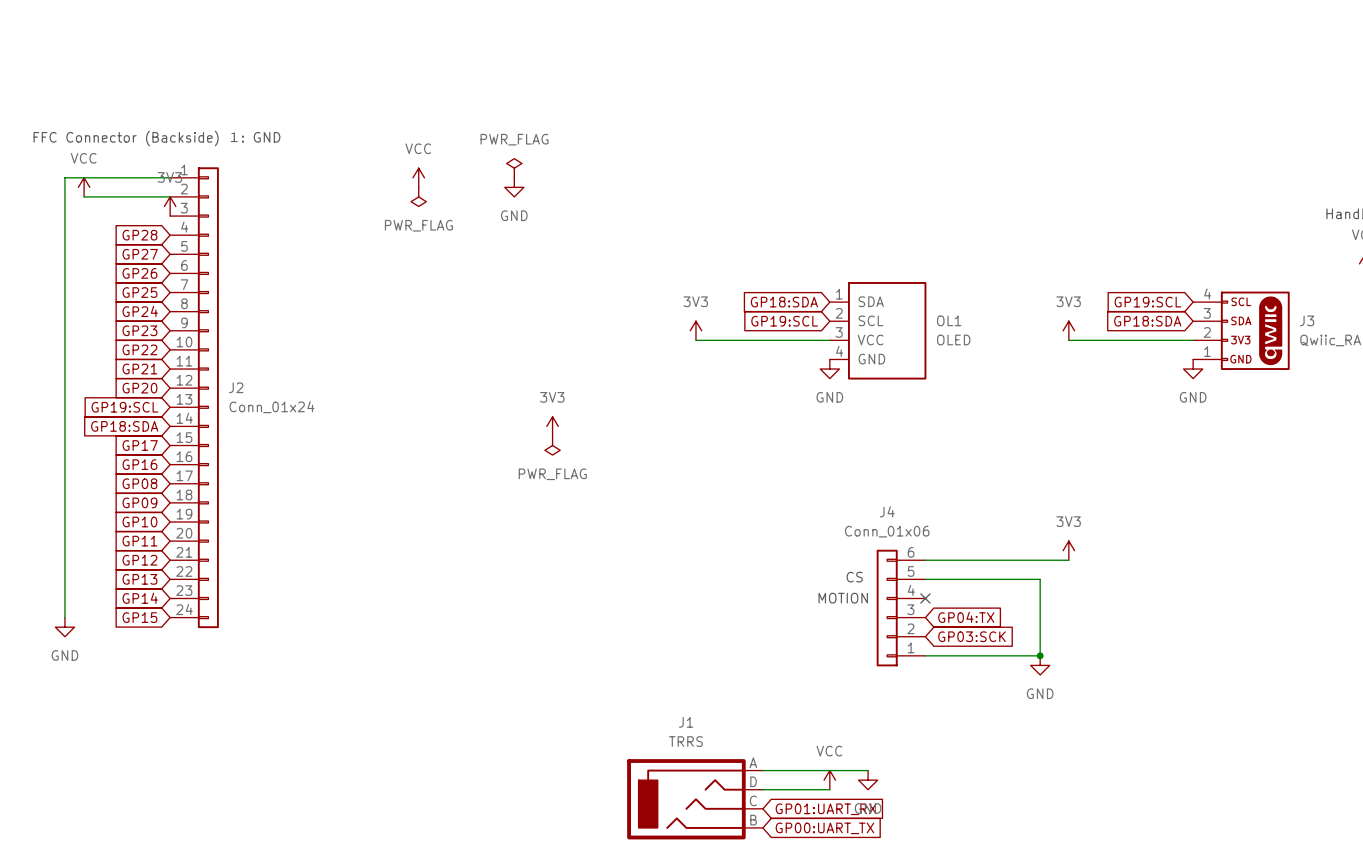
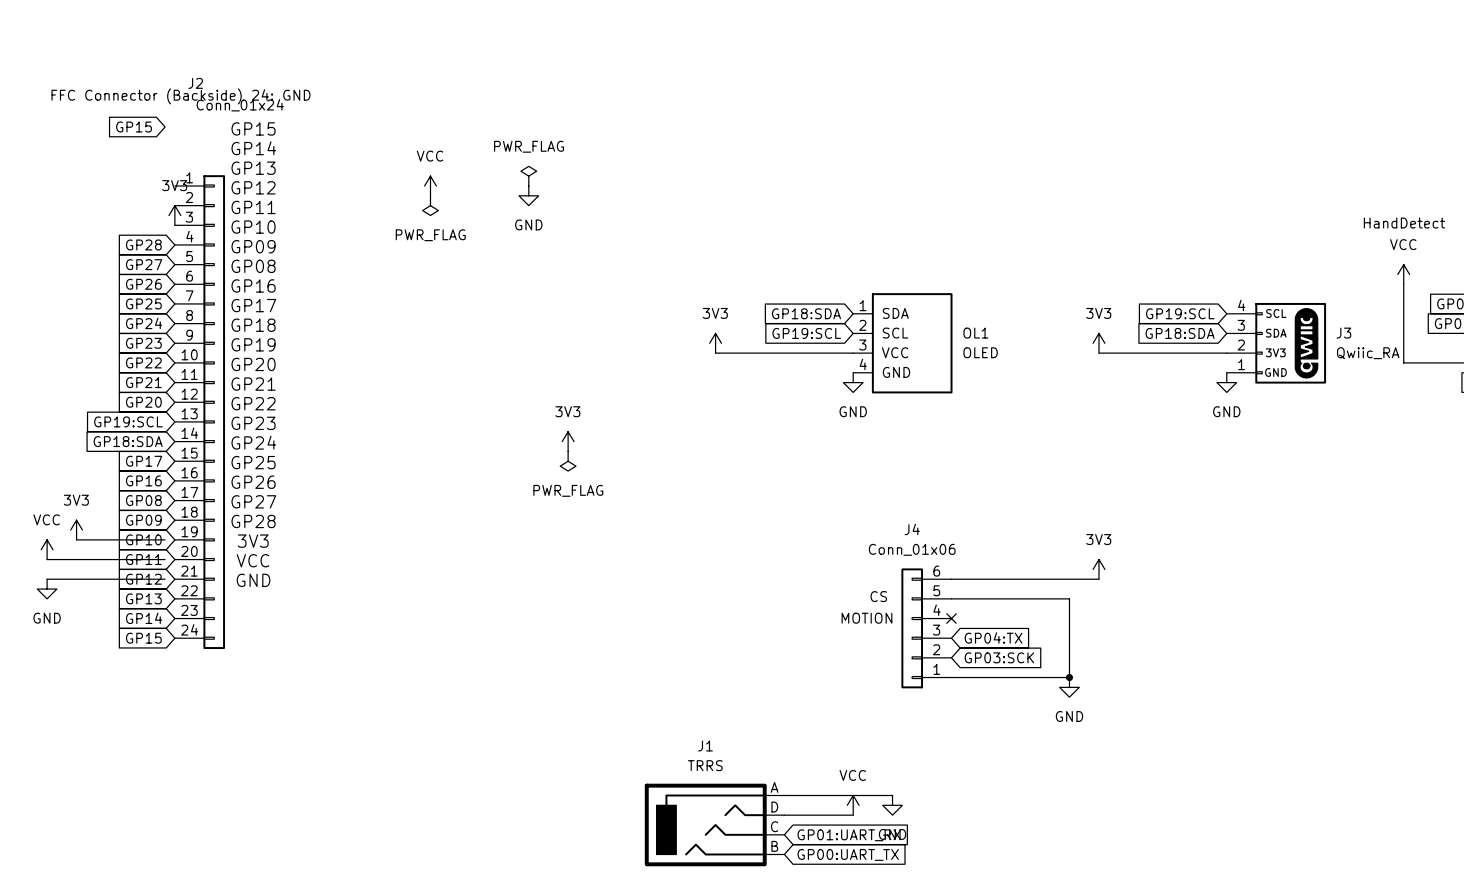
text: none -> FFC Connector (Backside) 24: GND (181, 96)
global label: none -> GP15 (134, 127)
text: none -> GP15 (253, 128)
text: FFC Connector (Backside) １: GND (156, 138) -> none
text: none -> GP14 (253, 148)
text: none -> GP13 (253, 168)
wire: (170, 177) (64, 177) (64, 617) -> none
text: none -> GP12 (253, 187)
power symbol: VCC (84, 187) -> none
wire: (84, 196) (170, 196) -> none
text: none -> GP11 (253, 207)
text: none -> GP10 (253, 227)
text: none -> GP09 (253, 246)
text: none -> GP08 (253, 266)
text: none -> GP16 (253, 285)
text: none -> GP17 (253, 305)
text: none -> GP18 (253, 325)
text: none -> GP19 (253, 344)
text: none -> GP20 (253, 364)
text: none -> GP21 (253, 384)
J2 name position: J2 (236, 387) -> J2 (195, 83)
text: none -> GP22 (253, 403)
J2 value position: Conn_01x24 (271, 407) -> Conn_01x24 (240, 105)
text: none -> GP23 (253, 423)
text: none -> GP24 (253, 442)
text: none -> GP25 (253, 462)
text: none -> GP26 (253, 482)
text: none -> GP27 (253, 501)
text: none -> GP28 (253, 521)
power symbol: none -> 3V3 (76, 530)
wire: none -> (76, 539) (165, 539)
text: none -> 3V3 (253, 541)
power symbol: none -> VCC (47, 549)
wire: none -> (47, 559) (165, 559)
text: none -> VCC (252, 560)
wire: none -> (47, 579) (165, 579)
text: none -> GND (253, 580)
power symbol position: GND (64, 627) -> GND (47, 589)

